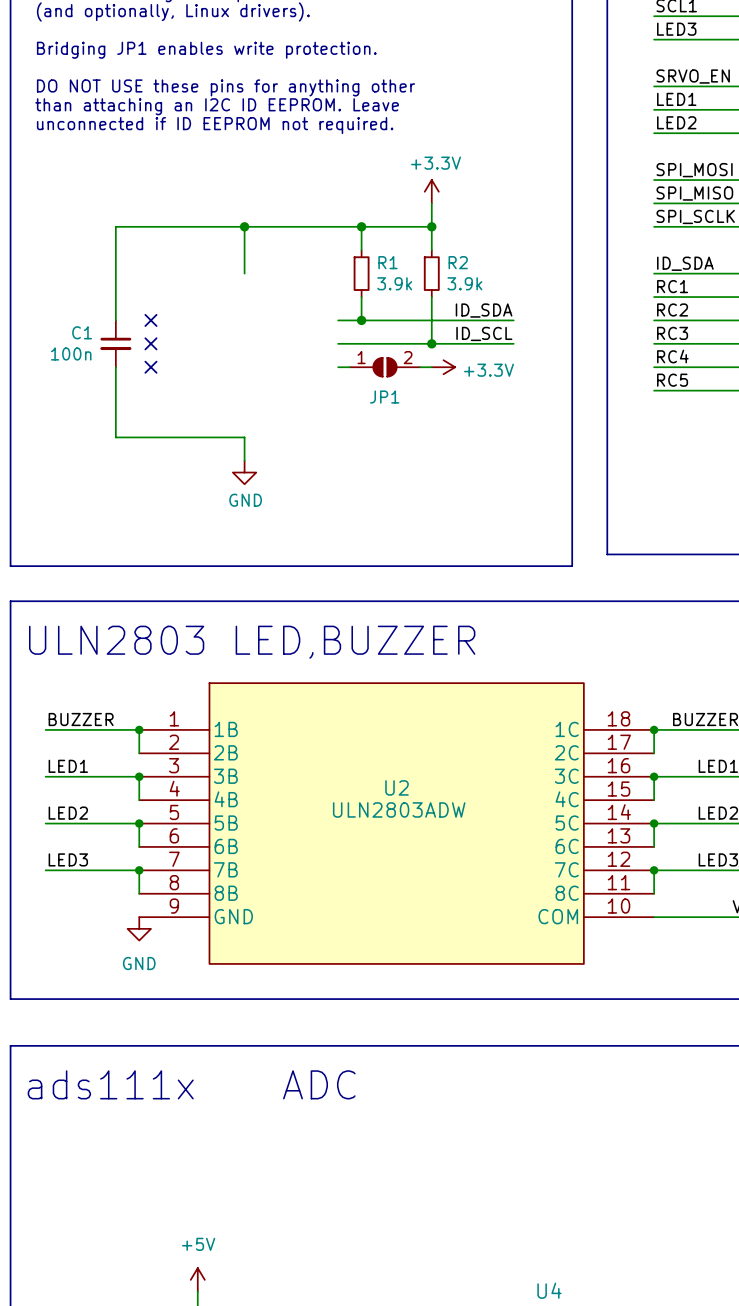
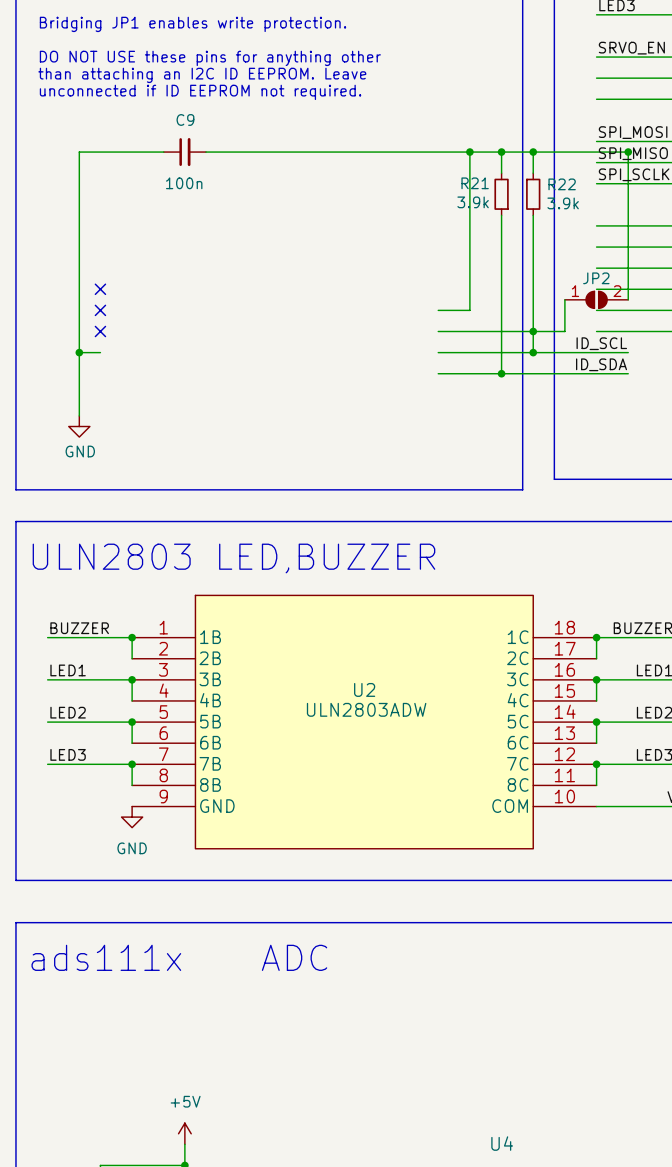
label: LED1 (676, 99) -> none
label: LED2 (676, 122) -> none
wire: none -> (163, 152) (79, 152) (79, 415)
C9: none -> 100n (184, 152)
wire: none -> (205, 152) (628, 152) (628, 299)
power symbol: +3.3V (431, 191) -> none
wire: none -> (469, 152) (469, 310) (438, 310)
junction: none -> (469, 152)
junction: none -> (501, 152)
wire: none -> (533, 152) (533, 173)
junction: none -> (533, 152)
junction: none -> (628, 152)
wire: (431, 203) (431, 250) -> none
wire: (244, 226) (244, 273) -> none
junction: (244, 226) -> none
wire: (361, 226) (361, 250) -> (501, 152) (501, 173)
junction: (361, 226) -> none
wire: (431, 226) (115, 226) (115, 320) -> none
junction: (431, 226) -> none
R21: none -> 3.9k (501, 194)
R22: none -> 3.9k (533, 194)
wire: none -> (501, 215) (501, 373)
wire: none -> (533, 215) (533, 352)
label: ID_SDA (685, 263) -> none
R1: 3.9k (361, 273) -> none
R2: 3.9k (431, 273) -> none
label: RC1 (672, 286) -> none
wire: (361, 297) (361, 320) -> none
wire: (431, 297) (431, 343) -> none
label: RC2 (672, 309) -> none
label: ID_SDA (484, 310) -> none
no-connect mark: (150, 320) -> none
wire: (338, 320) (513, 320) -> none
junction: (361, 320) -> none
label position: ID_SCL (484, 333) -> ID_SCL (601, 343)
label: RC3 (672, 333) -> none
no-connect mark: none -> (100, 289)
C1: 100n (115, 343) -> none
no-connect mark: (150, 343) -> none
wire: (338, 343) (513, 343) -> none
junction: (431, 343) -> none
wire: none -> (564, 299) (564, 331) (438, 331)
JP2: none -> (596, 299)
label: RC4 (672, 356) -> none
no-connect mark: none -> (100, 310)
wire: (115, 367) (115, 437) (244, 437) (244, 460) -> none
no-connect mark: (150, 367) -> none
wire: (338, 367) (349, 367) -> none
JP1: (384, 367) -> none
wire: (420, 367) (431, 367) -> none
power symbol: +3.3V (443, 367) -> none
label: RC5 (672, 380) -> none
no-connect mark: none -> (100, 331)
junction: none -> (533, 331)
wire: none -> (79, 352) (100, 352)
junction: none -> (79, 352)
wire: none -> (438, 352) (628, 352)
junction: none -> (533, 352)
label: none -> ID_SDA (601, 364)
wire: none -> (438, 373) (628, 373)
junction: none -> (501, 373)
power symbol position: GND (244, 472) -> GND (79, 426)

